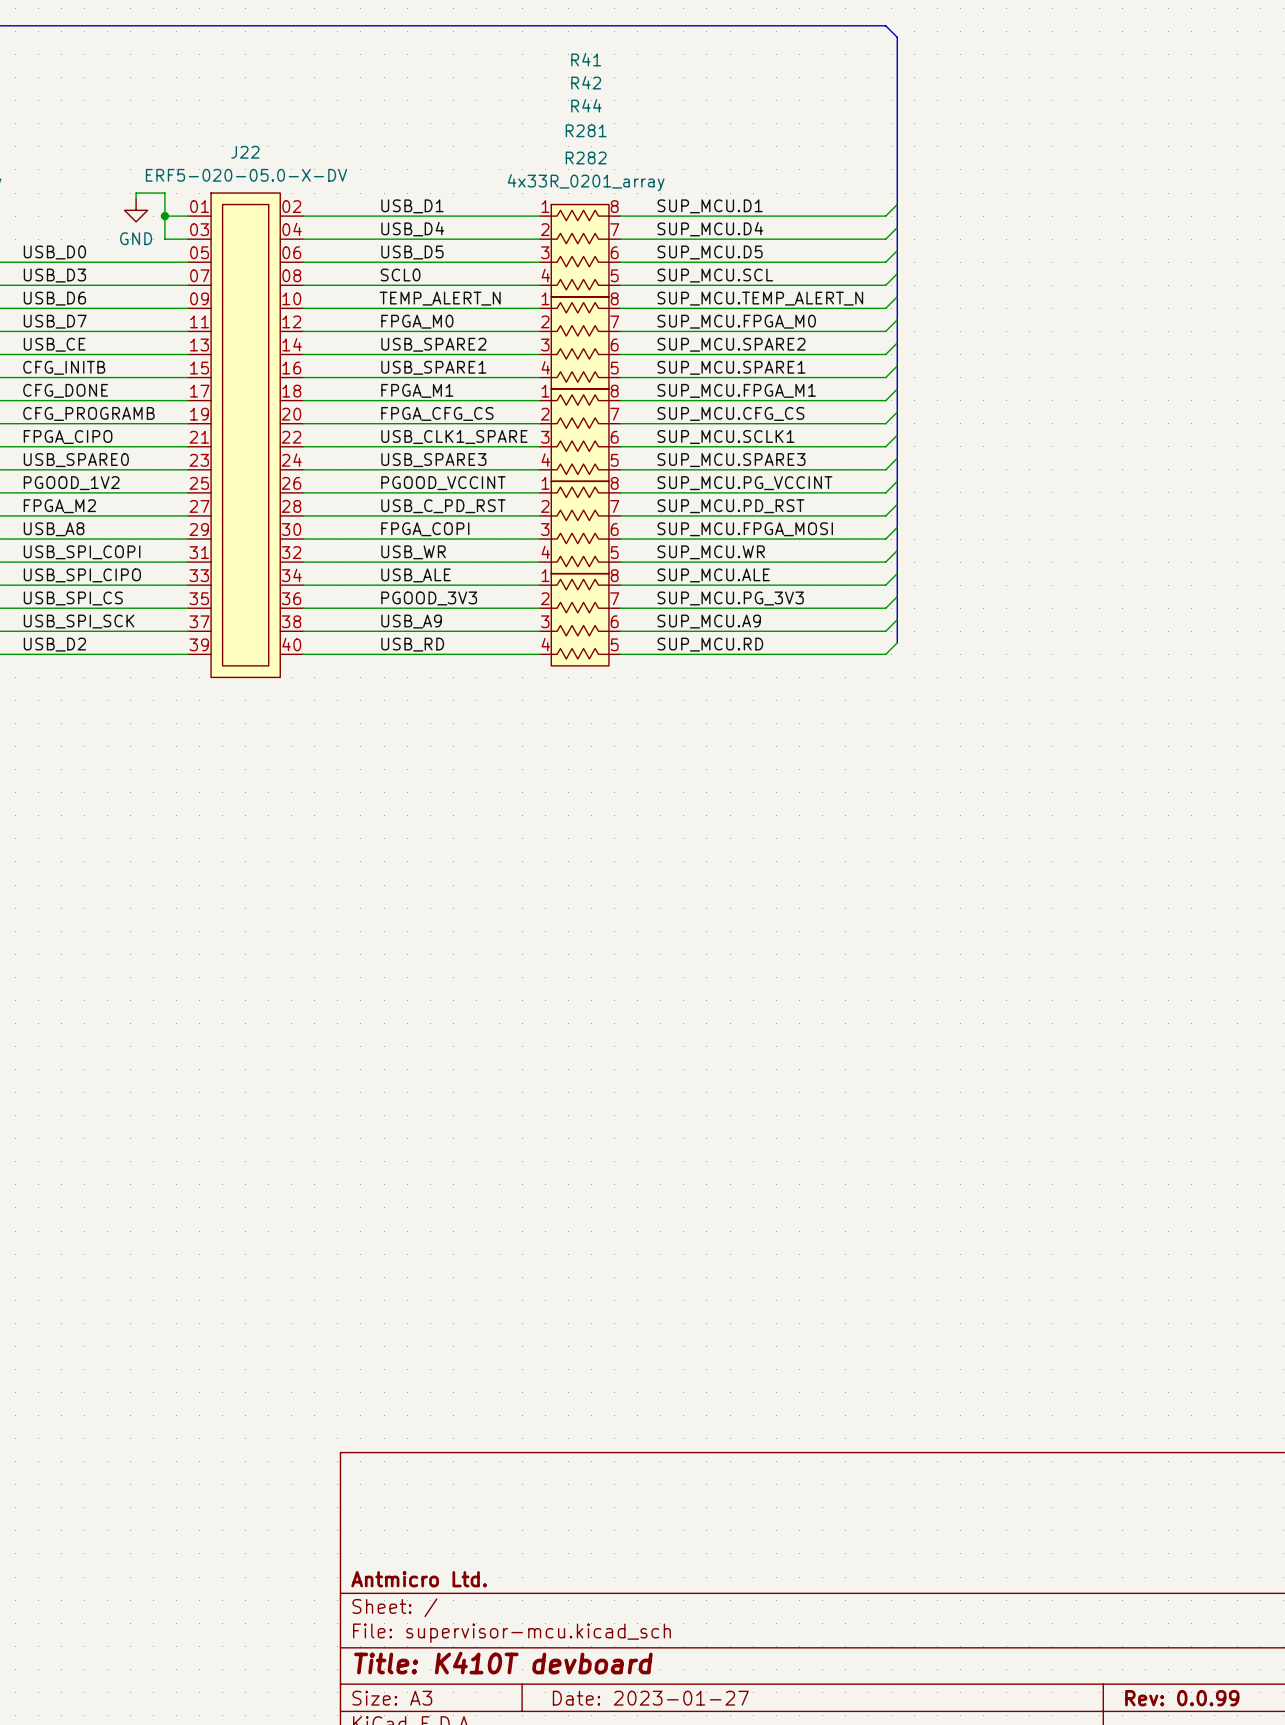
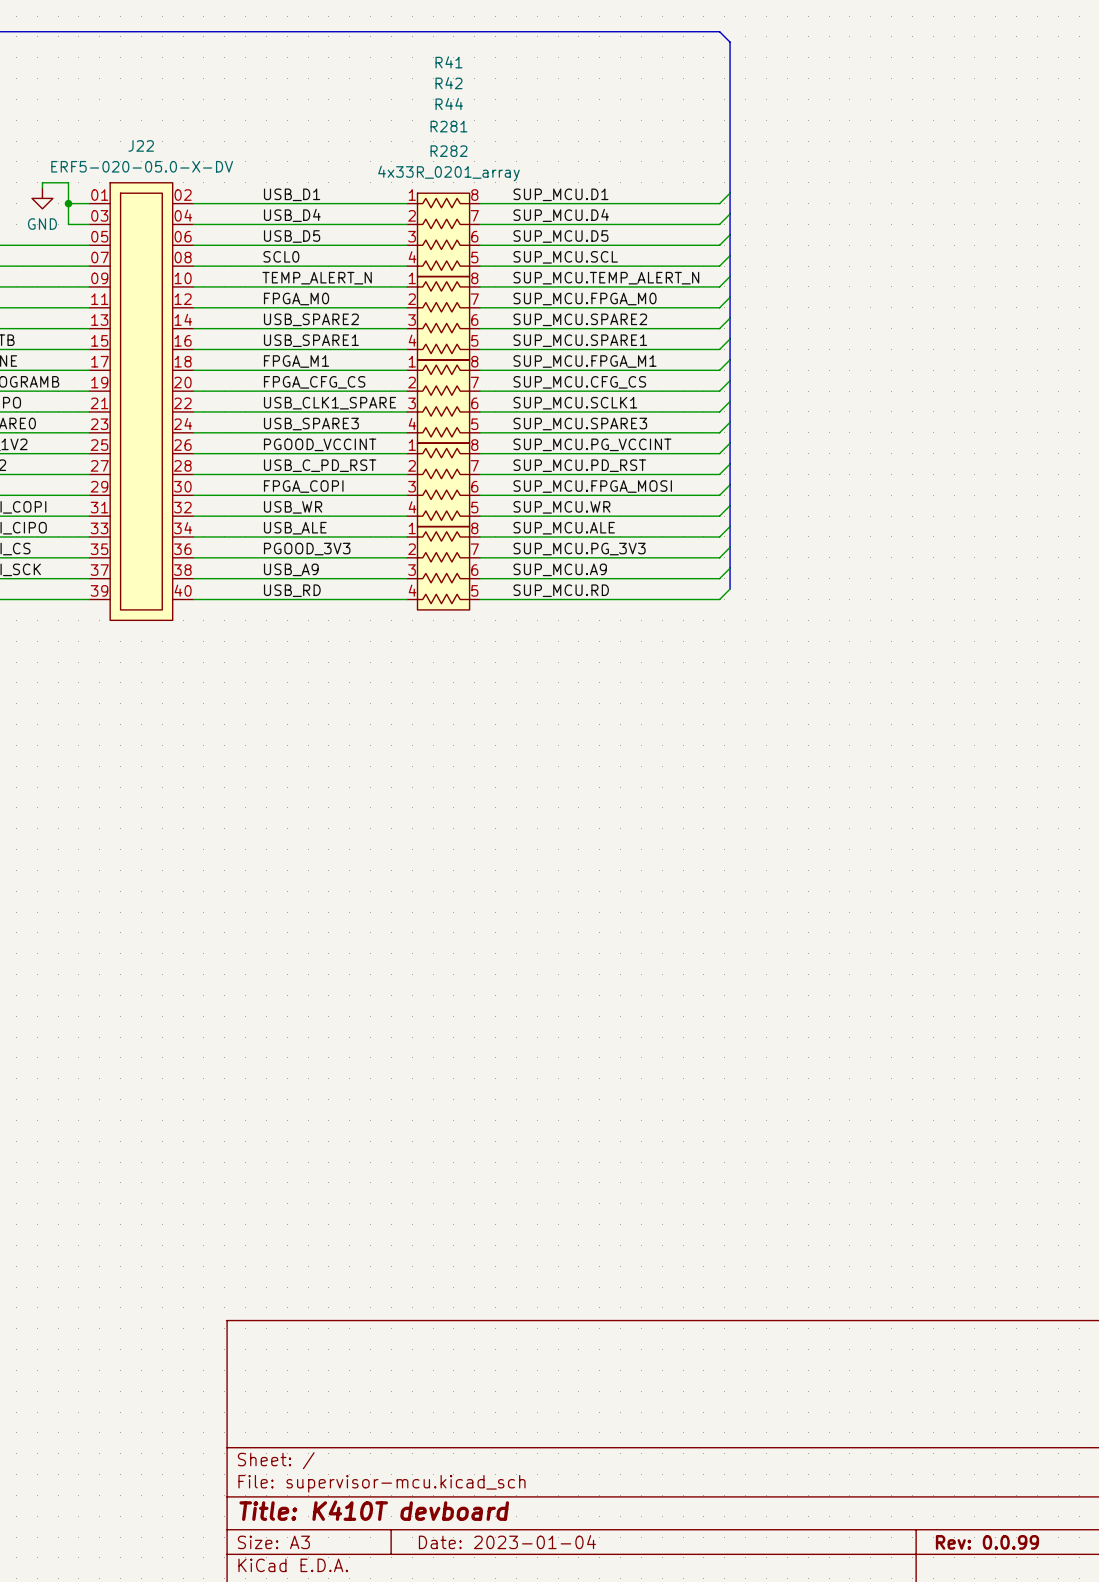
title block: Antmicro Ltd. (419, 1579) -> none
title block: Date: 2023-01-27 (650, 1698) -> Date: 2023-01-04 (507, 1542)

